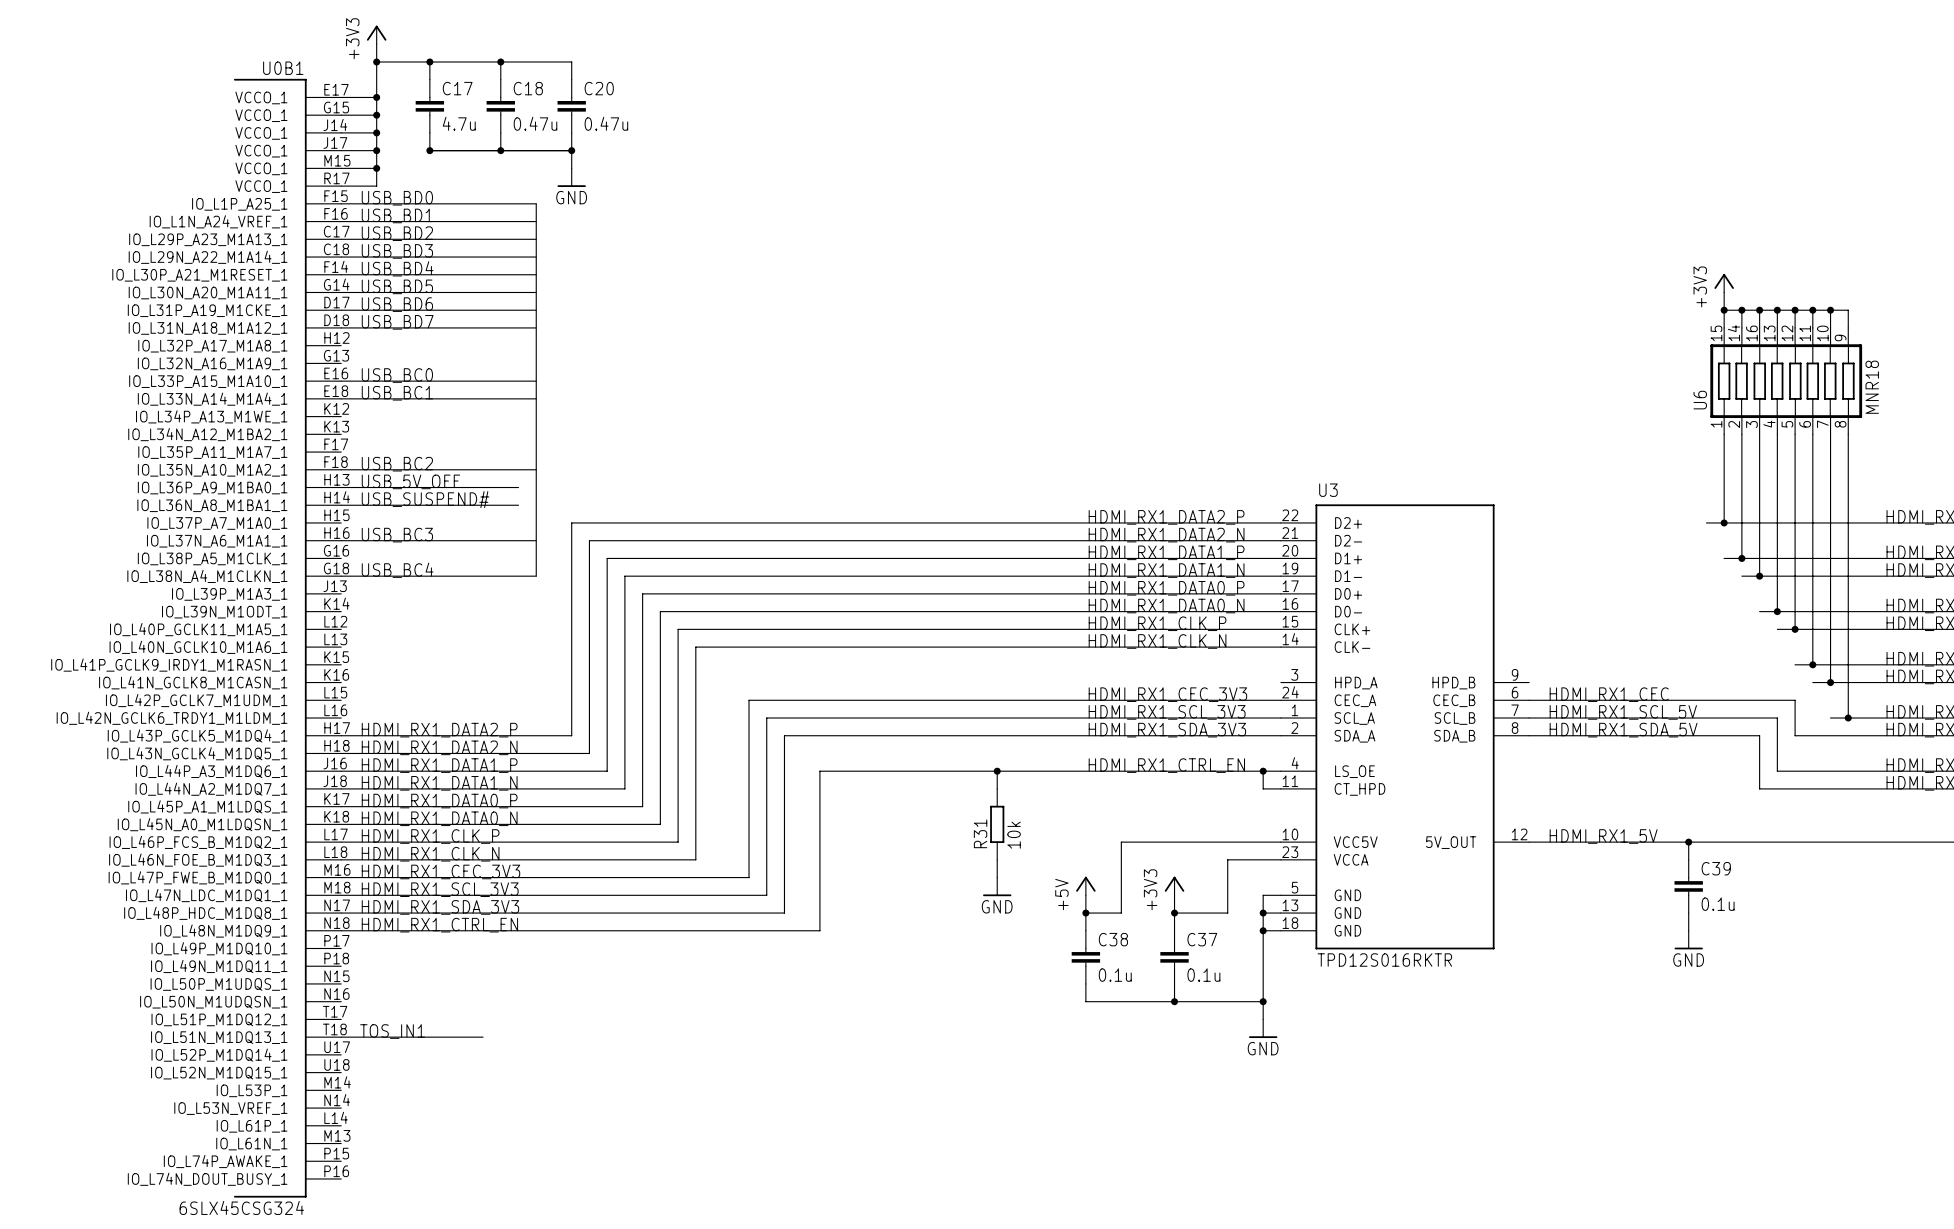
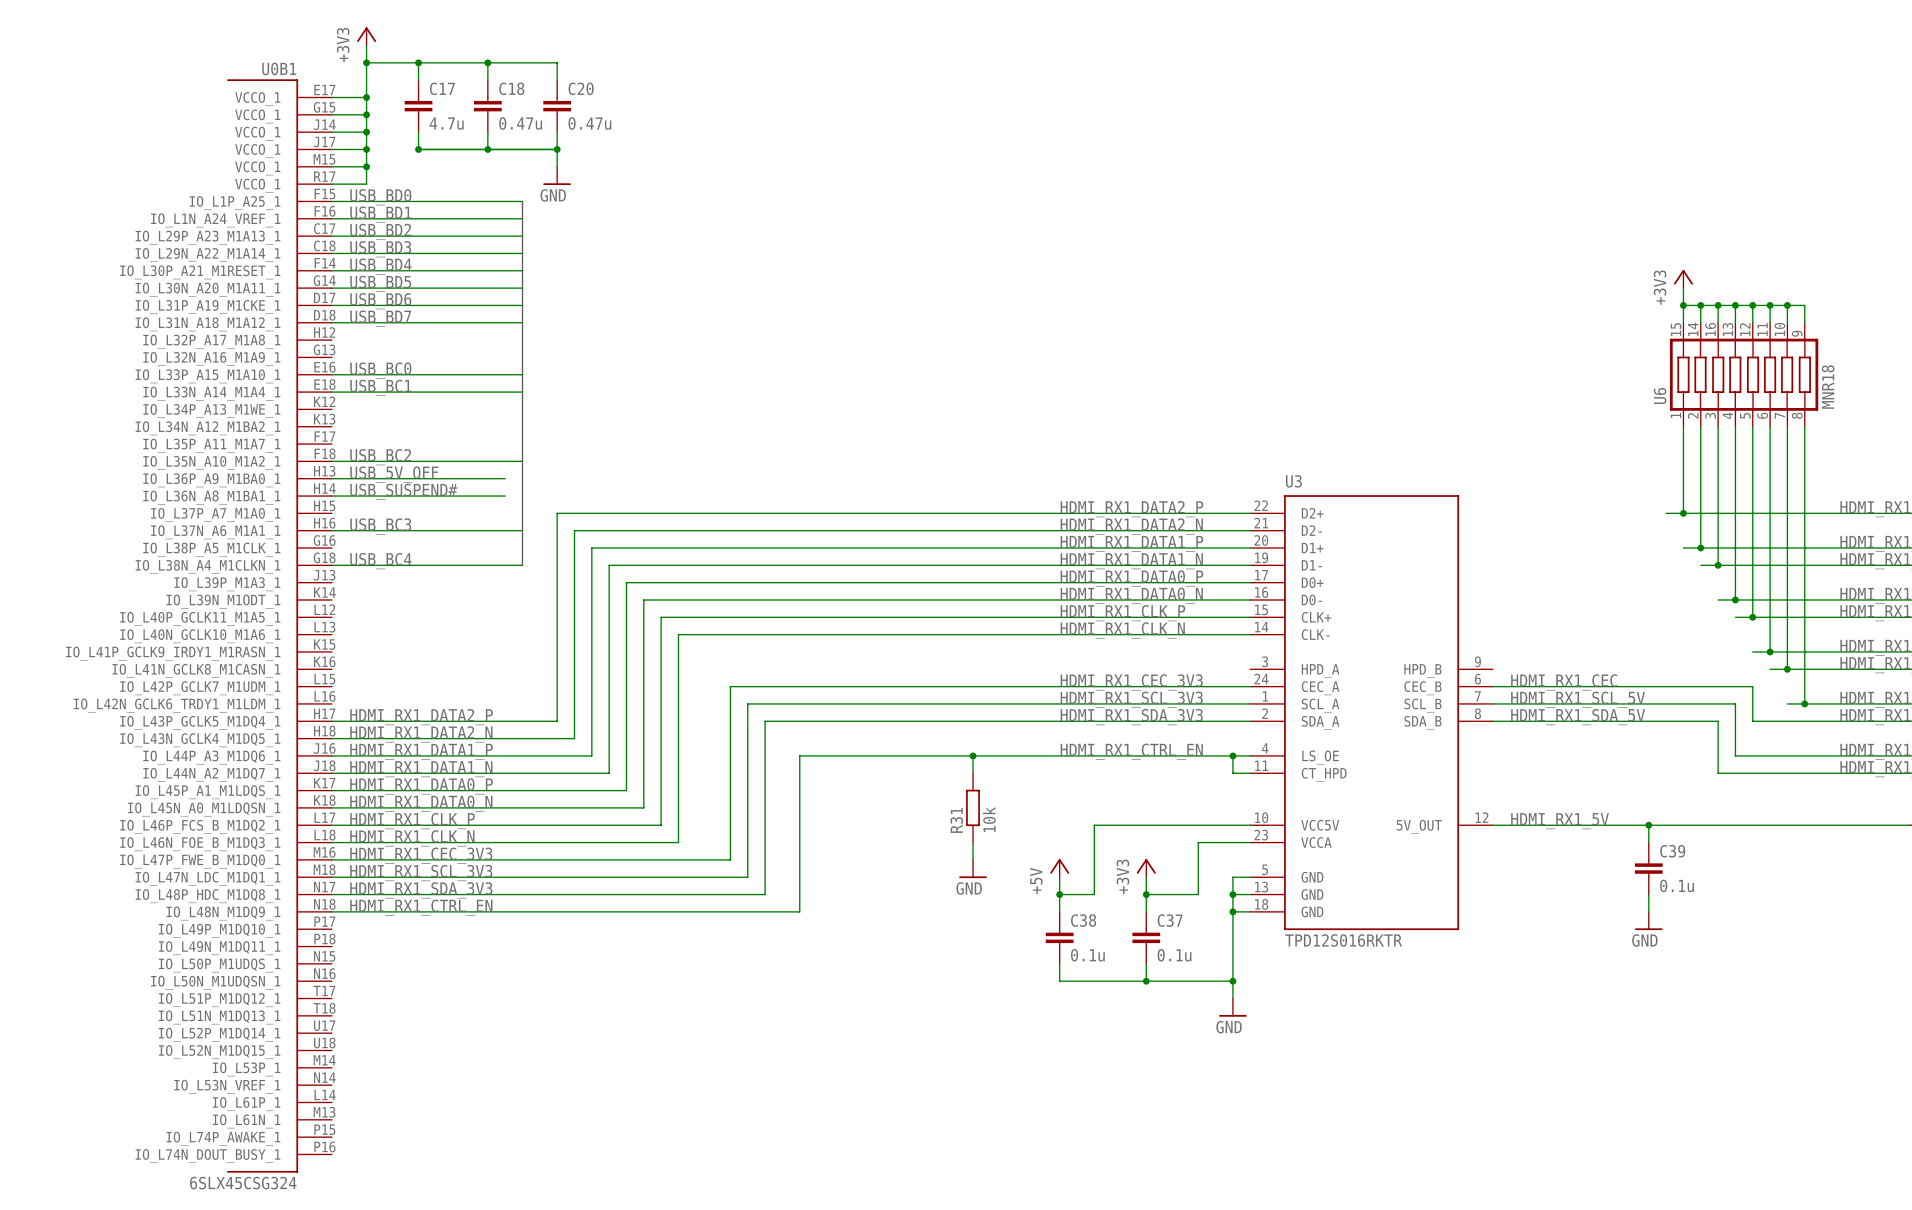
label: TOS_IN1 (392, 1031) -> none
wire: (341, 1037) (483, 1037) -> none

